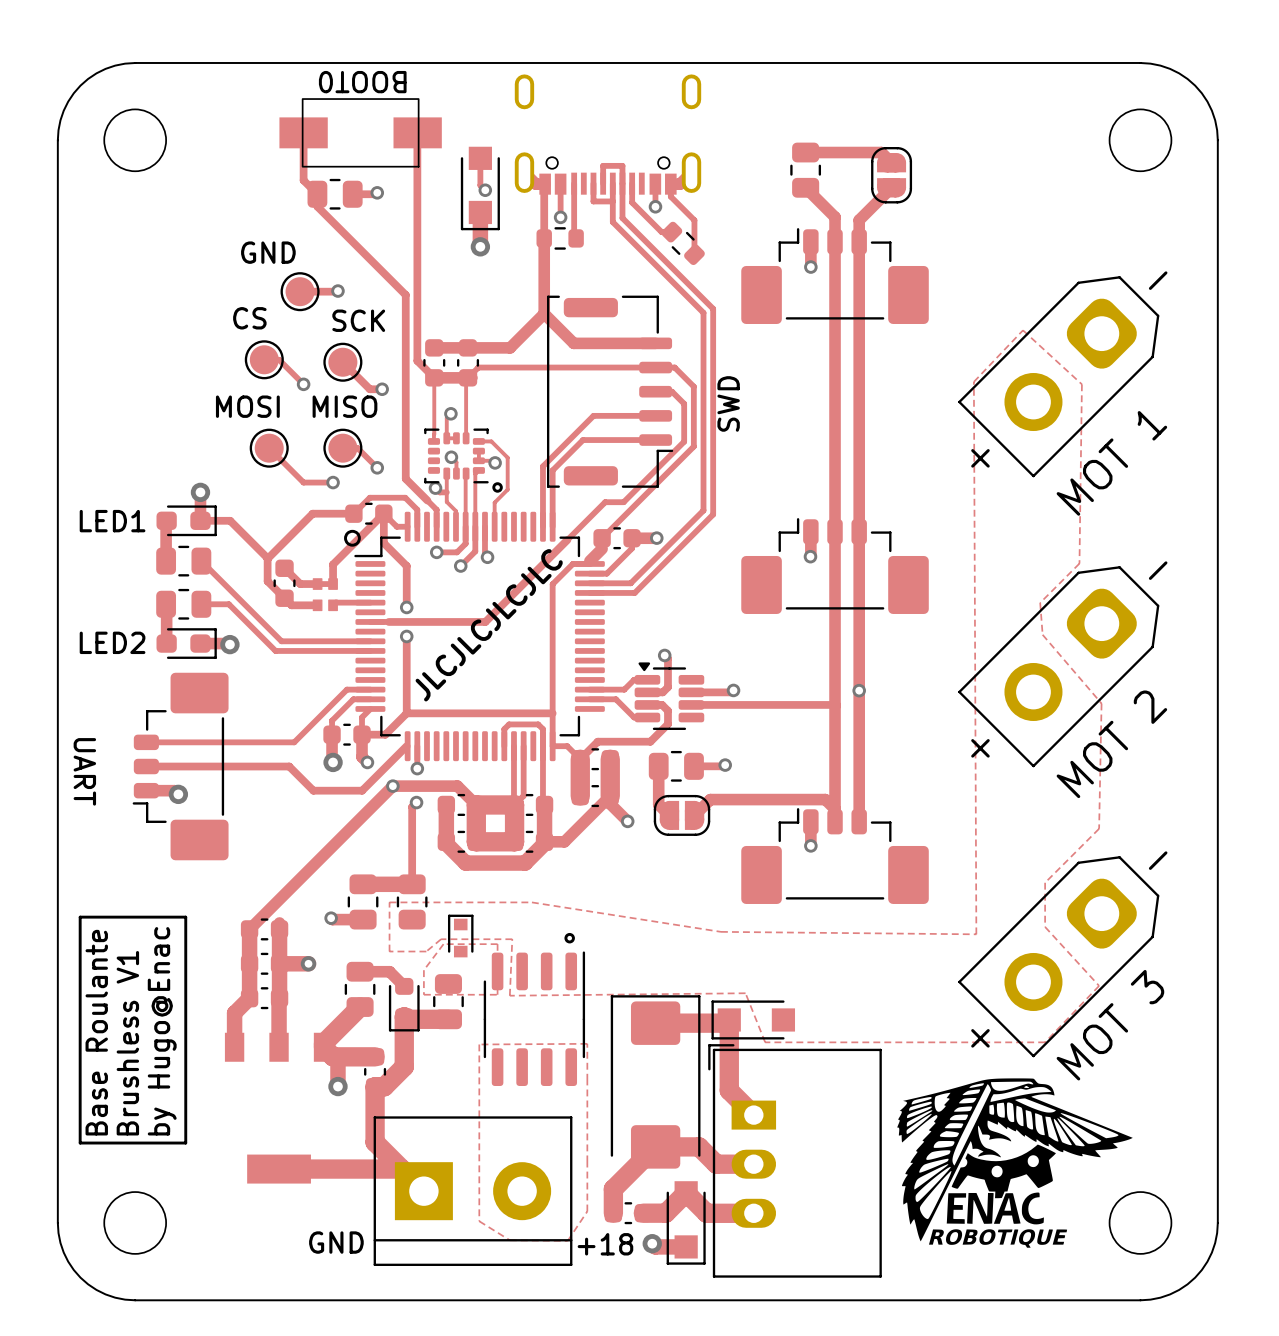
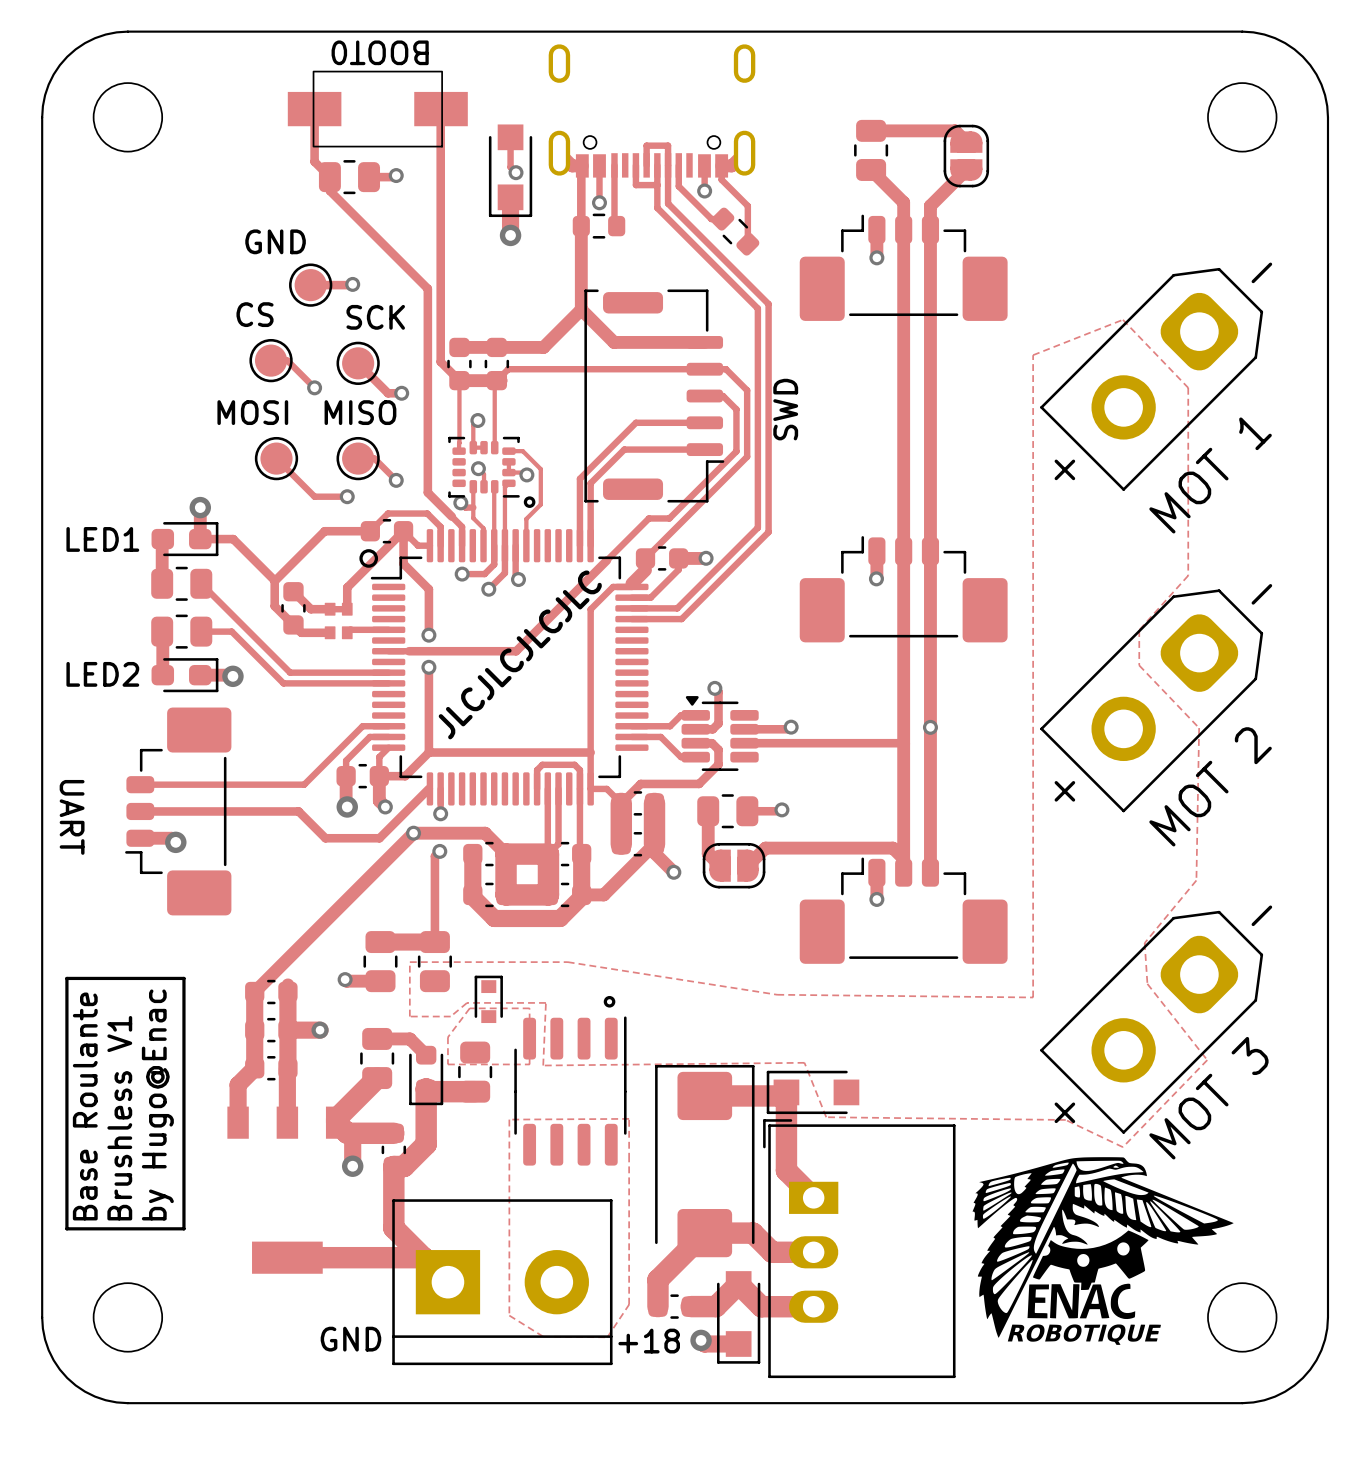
zone outline: (721, 931) (976, 934) (973, 381) (1023, 330) (1081, 384) (1079, 563) (1040, 602) (1042, 634) (1101, 703) (1099, 828) (1045, 882) (1045, 926) (1099, 985) (1045, 1042) (765, 1042) -> (777, 994) (1033, 997) (1033, 355) (1122, 319) (1188, 387) (1188, 575) (1139, 630) (1139, 665) (1199, 728) (1196, 880) (1144, 943) (1147, 983) (1207, 1060) (1122, 1147) (1065, 1119) (826, 1117)

